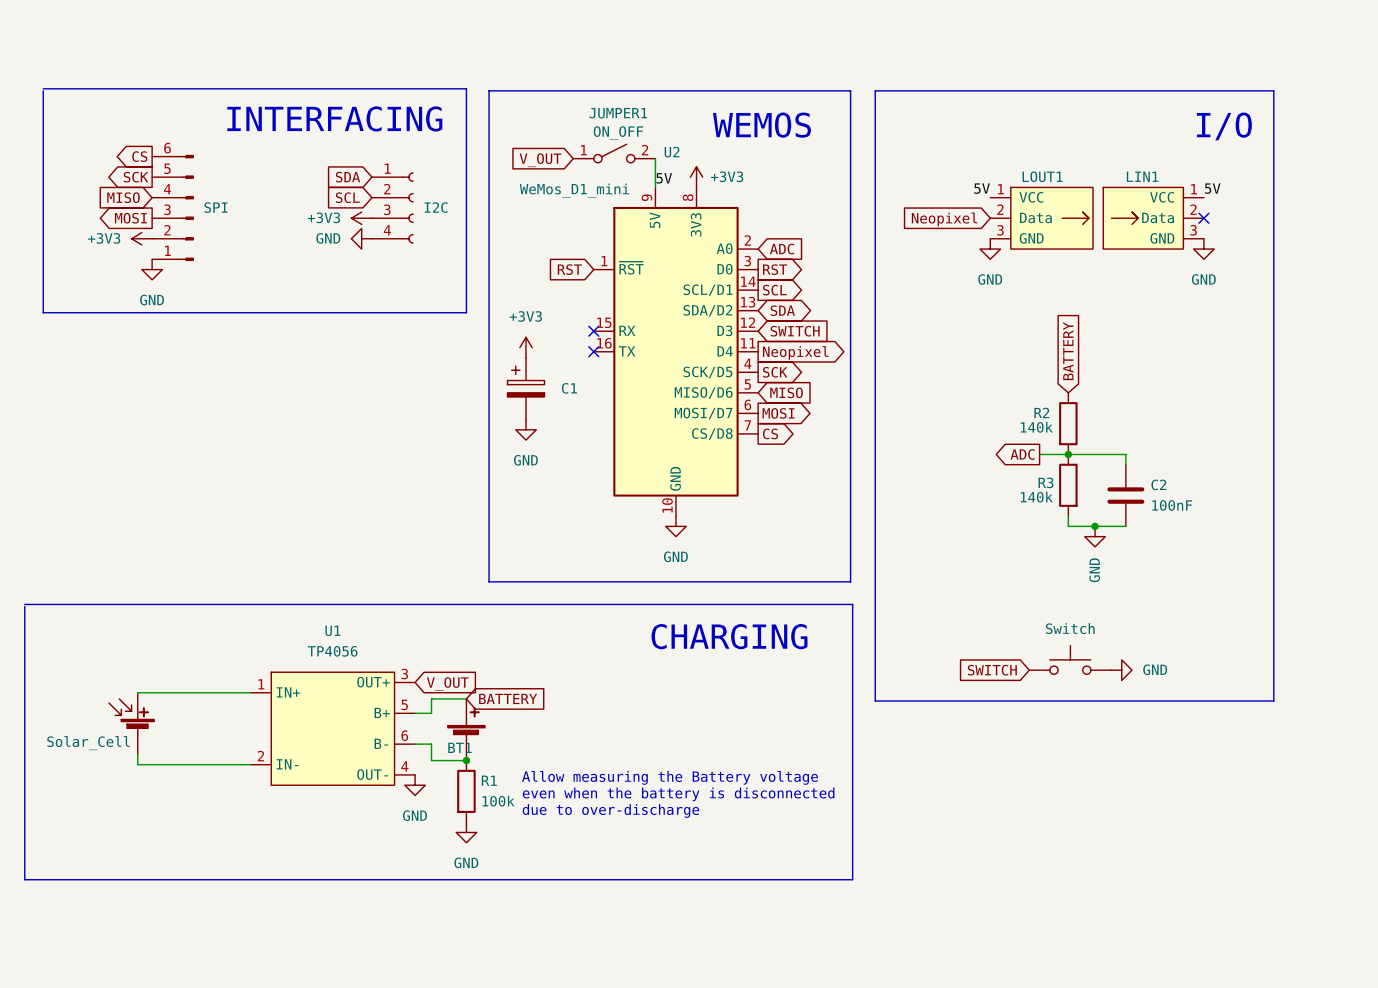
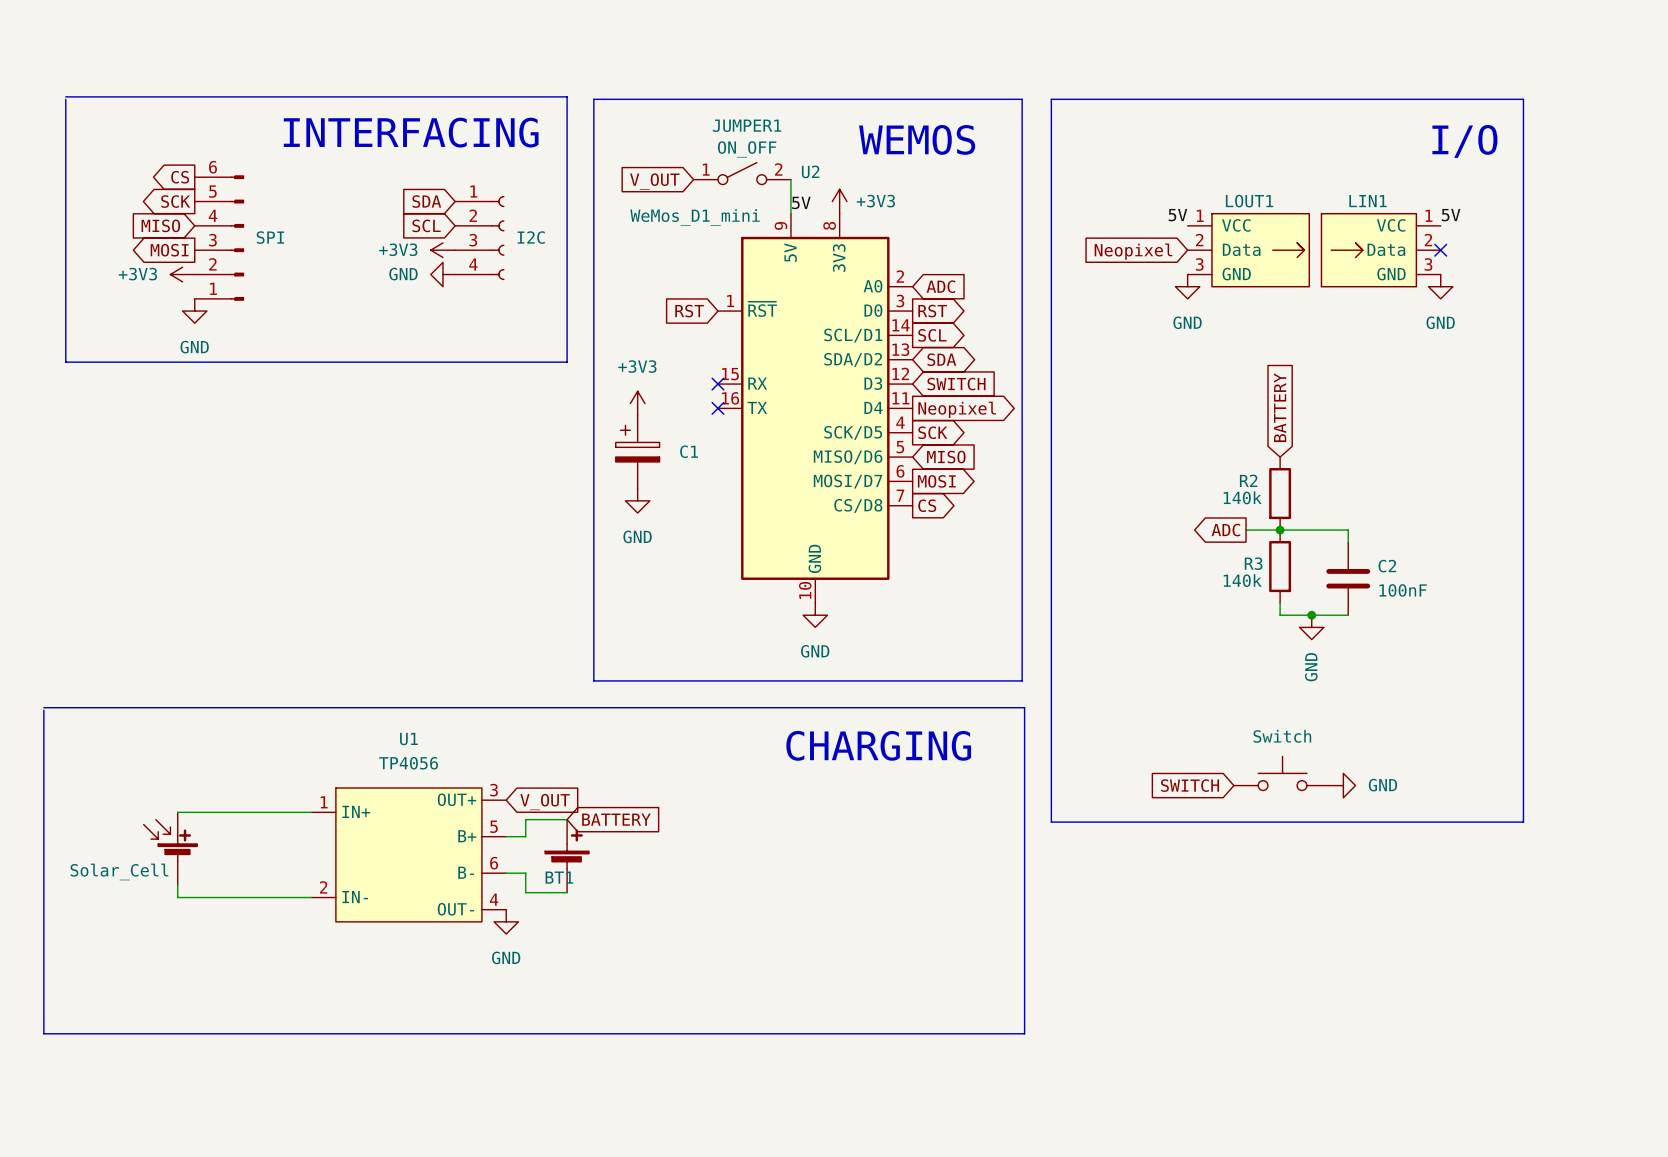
junction: (466, 760) -> none
text: Allow measuring the Battery voltage (670, 777) -> none
R1: 100k (466, 791) -> none
text: even when the battery is disconnected (678, 794) -> none
text: due to over-discharge (610, 810) -> none
power symbol: GND (466, 832) -> none

